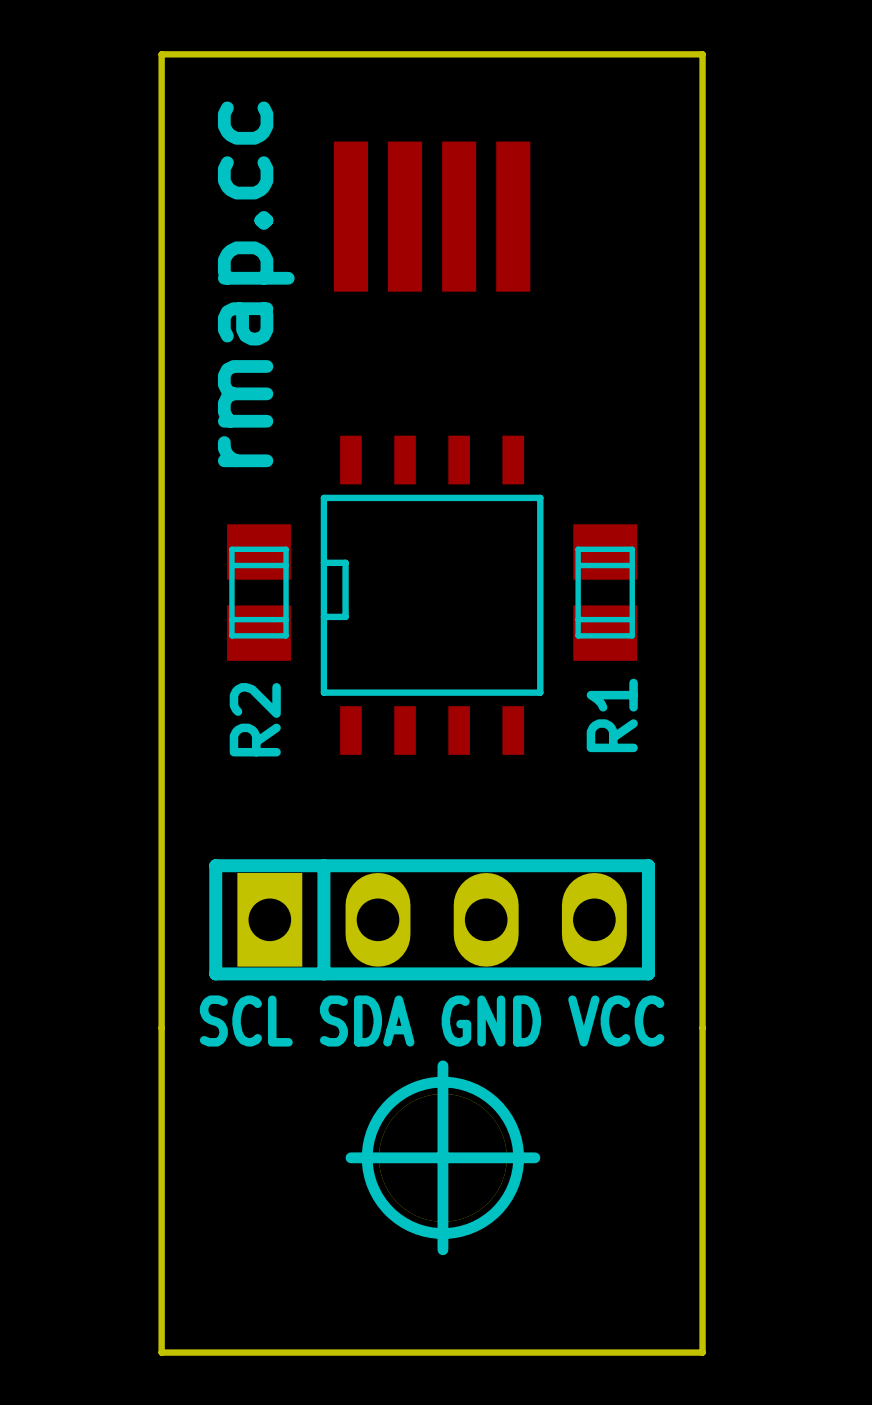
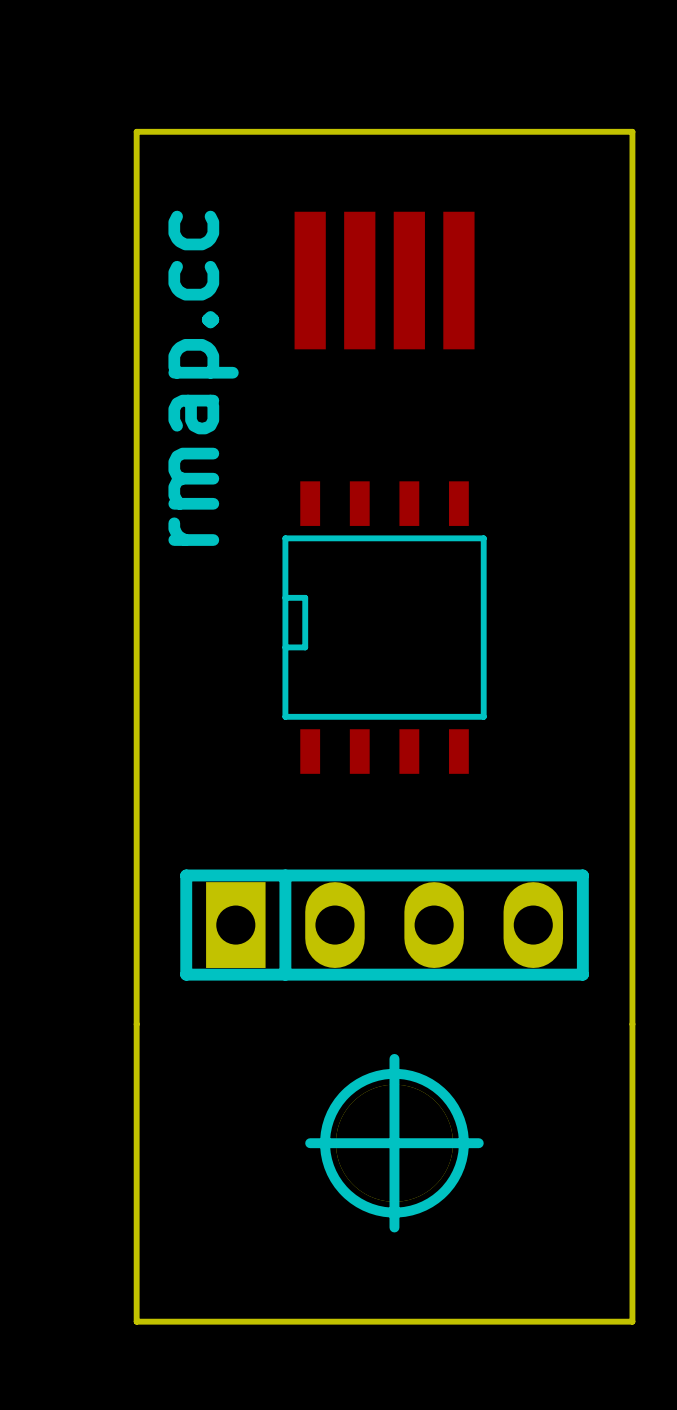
text position: rmap.cc (256, 284) -> rmap.cc (203, 378)
R2: (259, 592) -> none
R1: (605, 592) -> none
text: SCL SDA GND VCC (432, 1021) -> none

